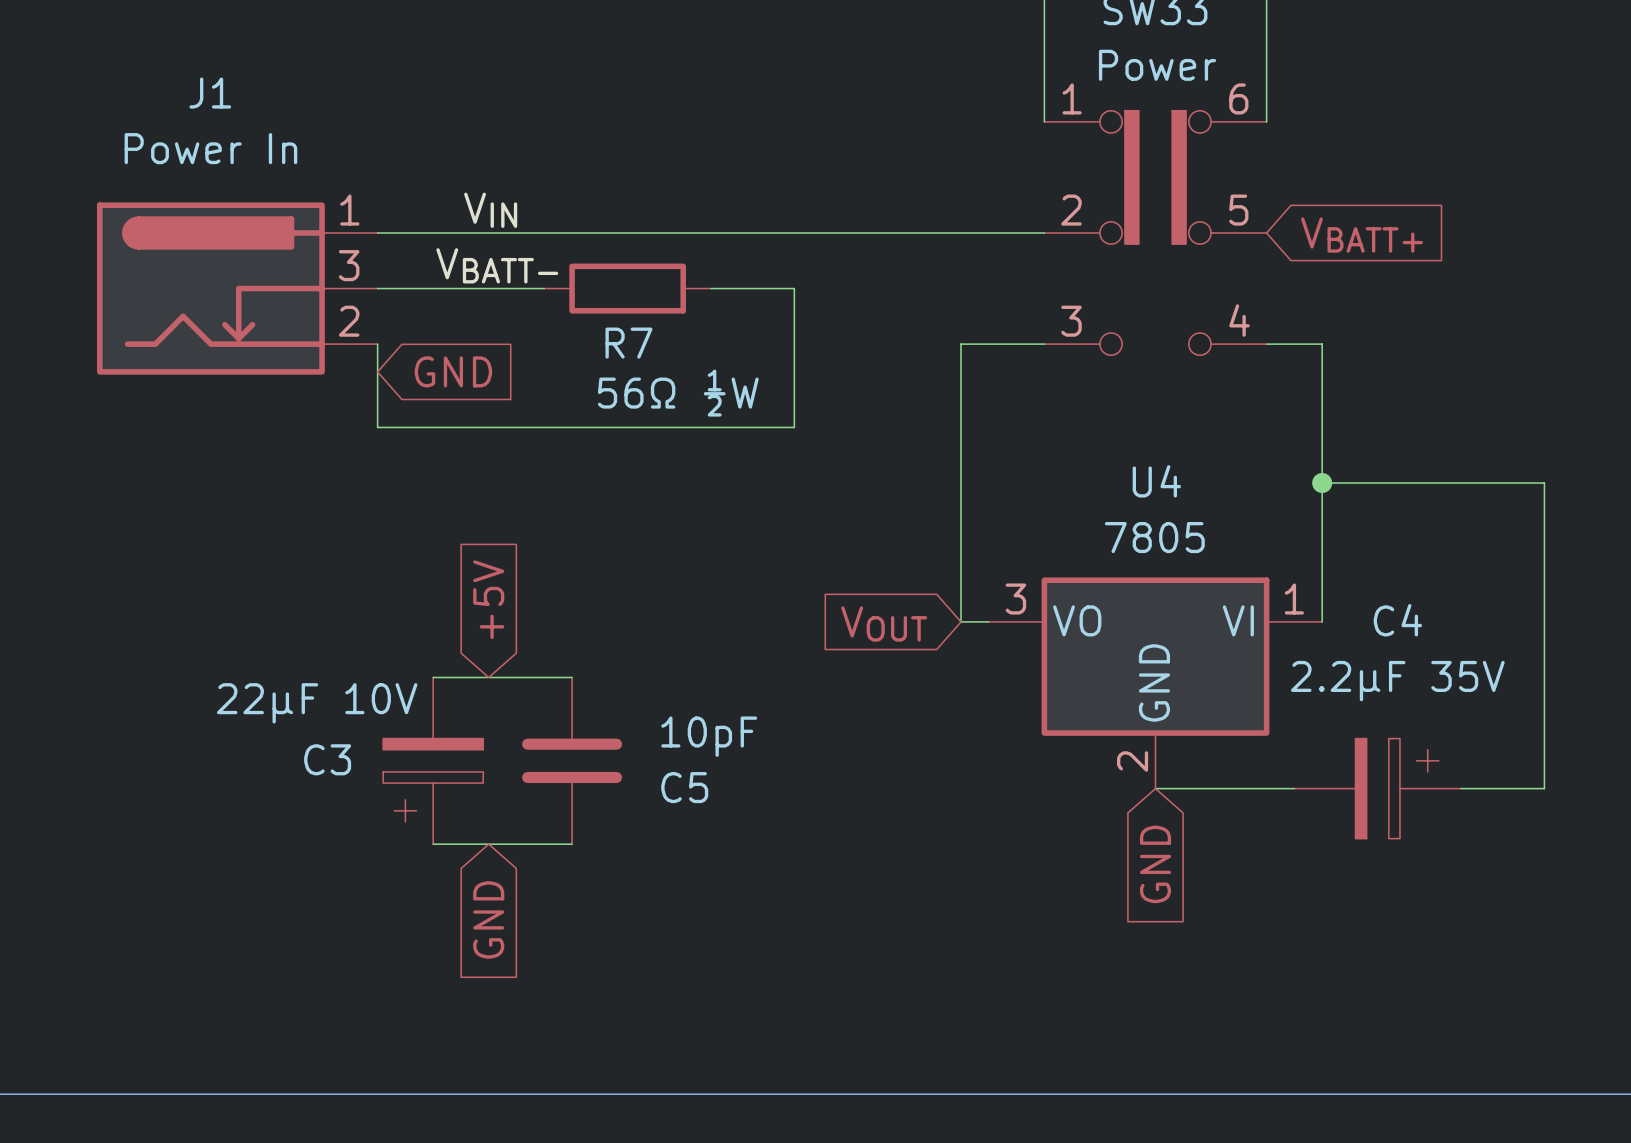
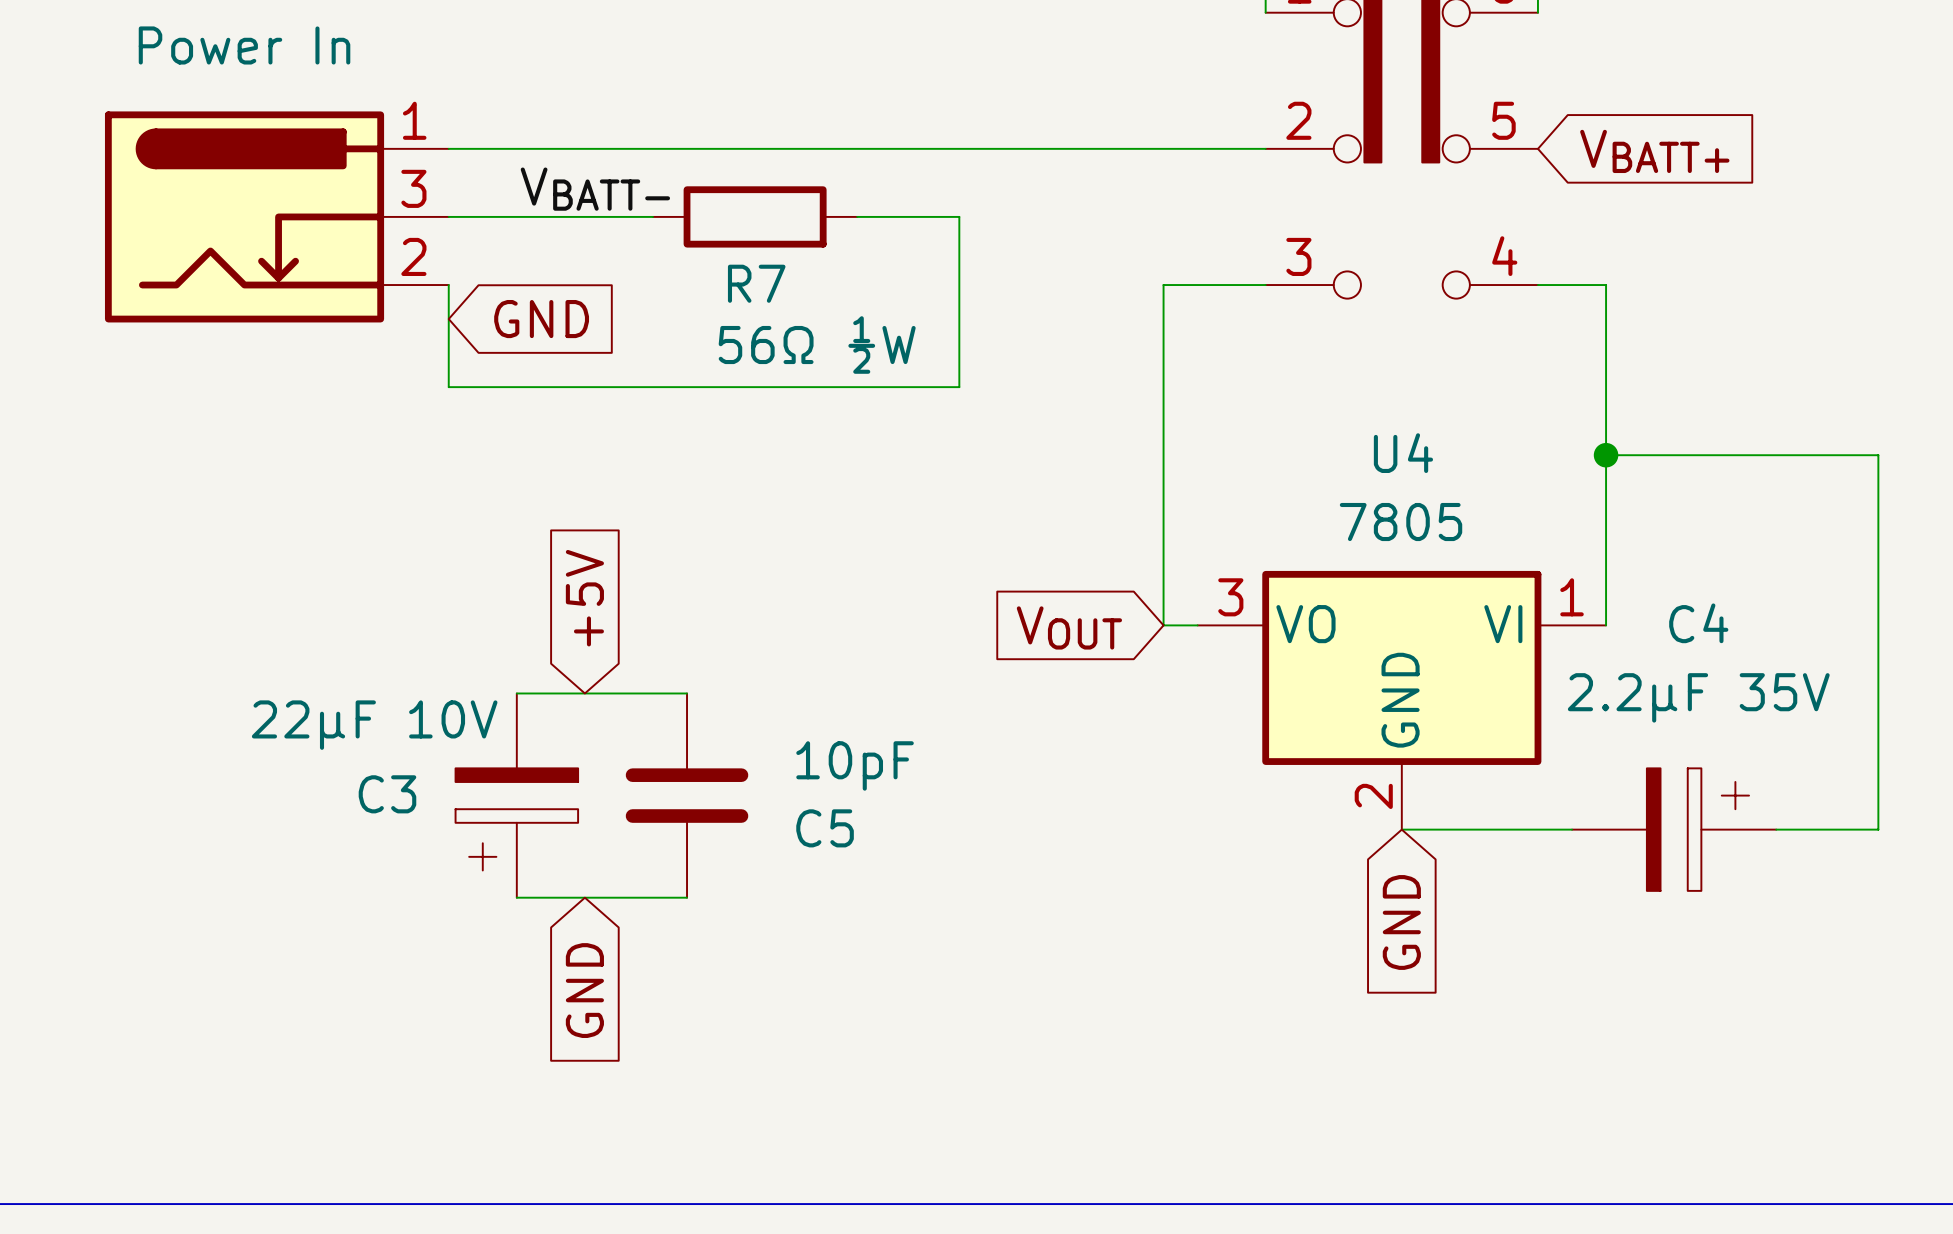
label: VIN (490, 210) -> none

